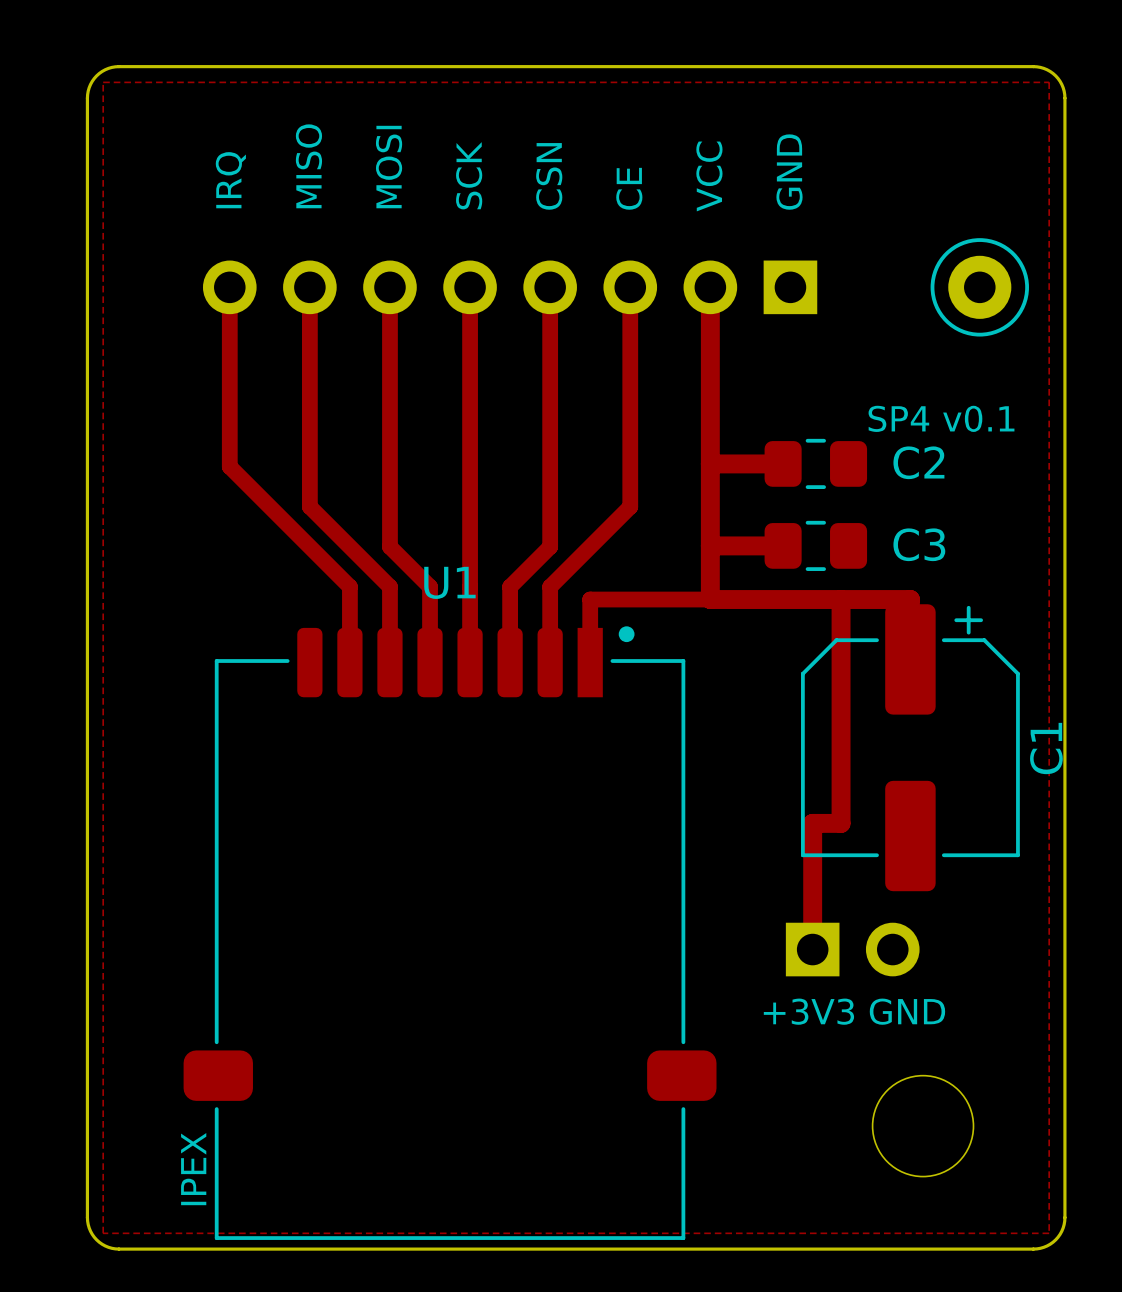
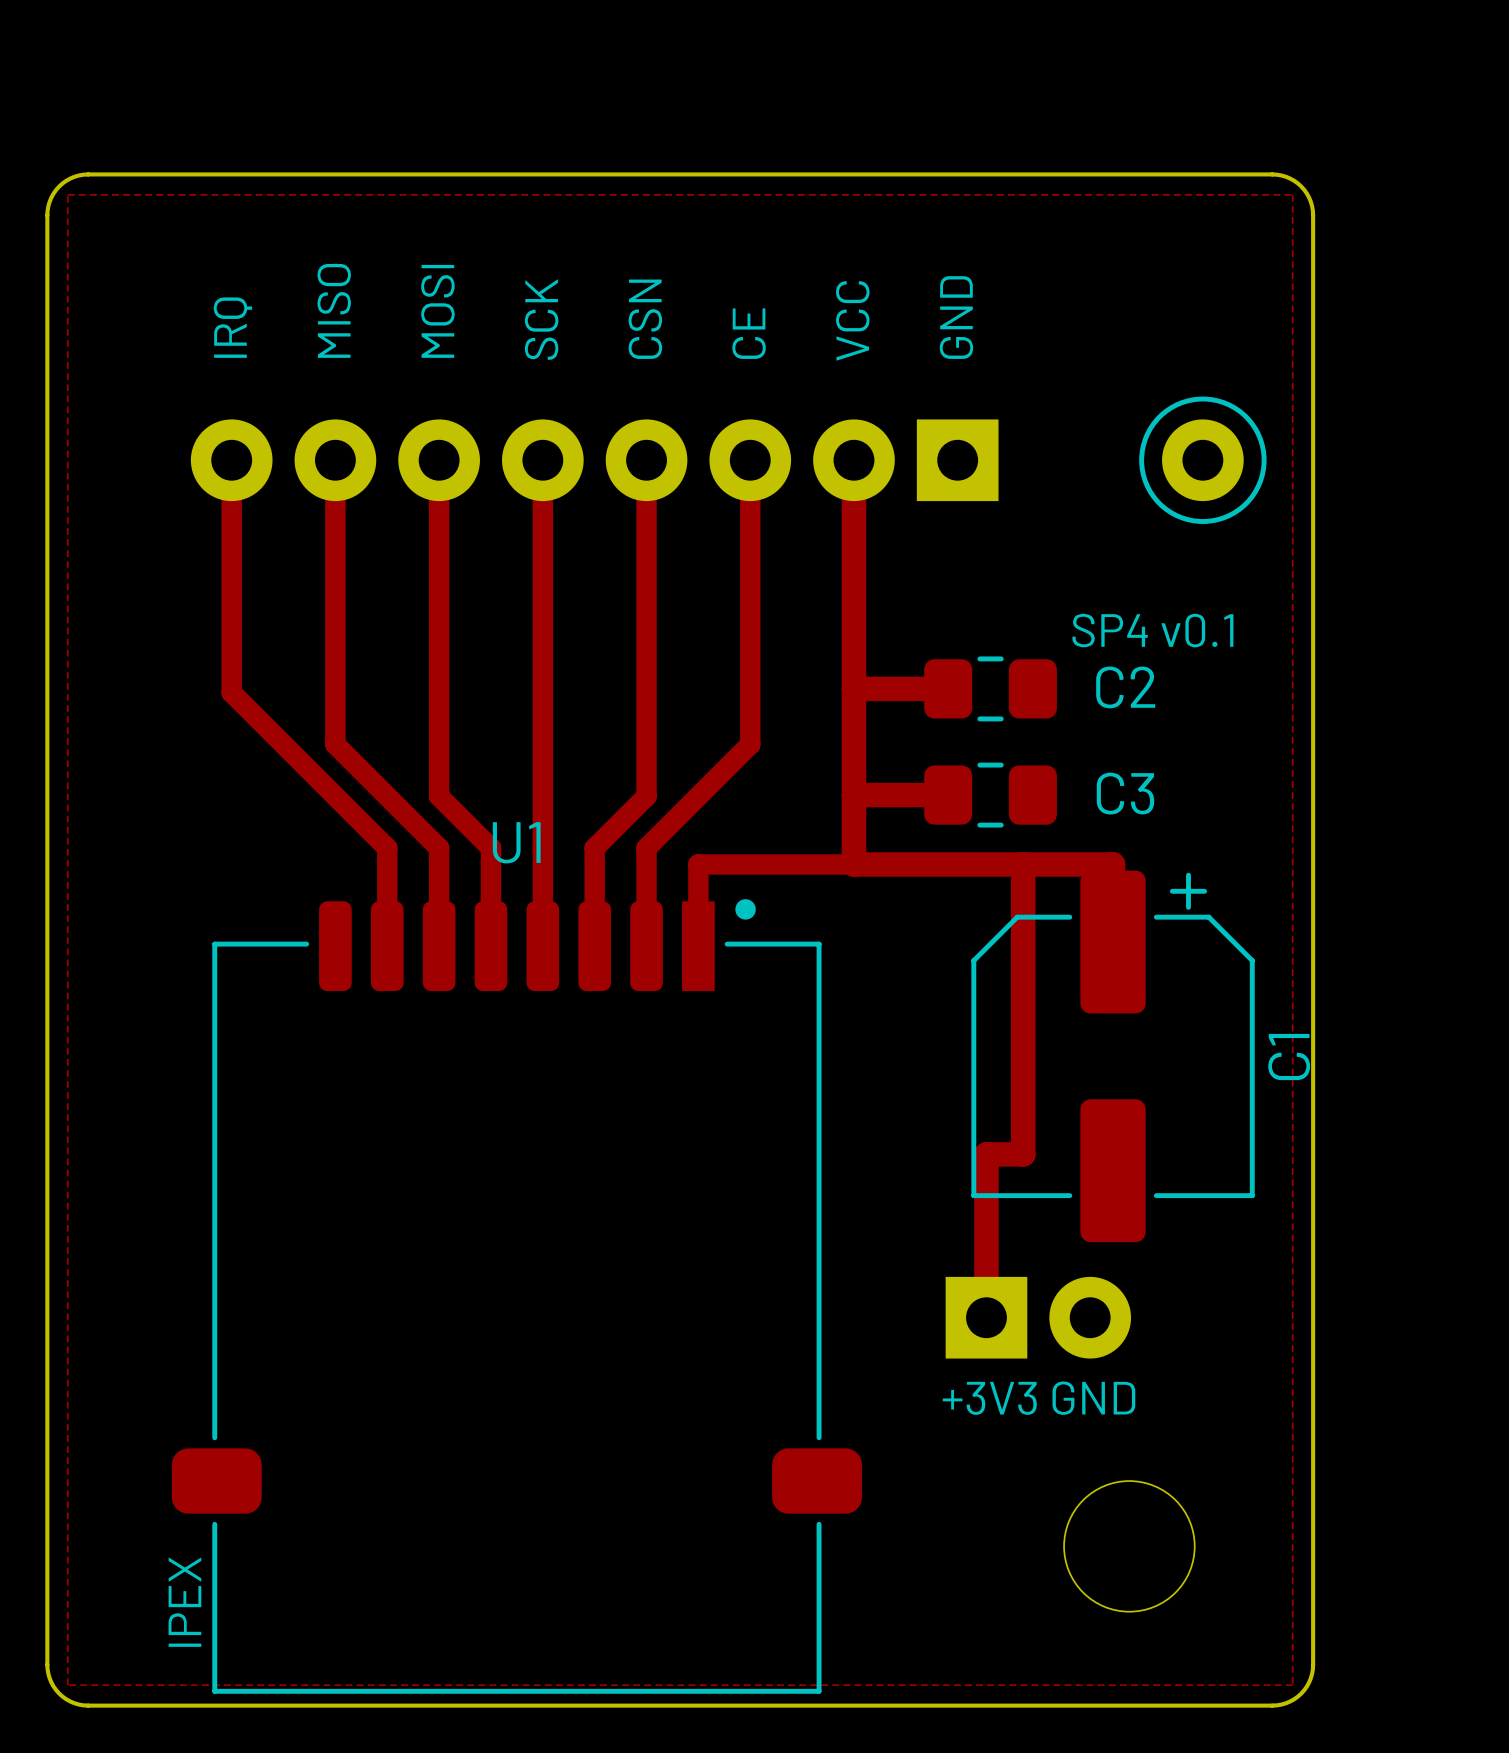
part footprint: [202, 260, 818, 315] -> [190, 419, 999, 502]
part footprint: [785, 922, 920, 977] -> [945, 1276, 1132, 1359]

